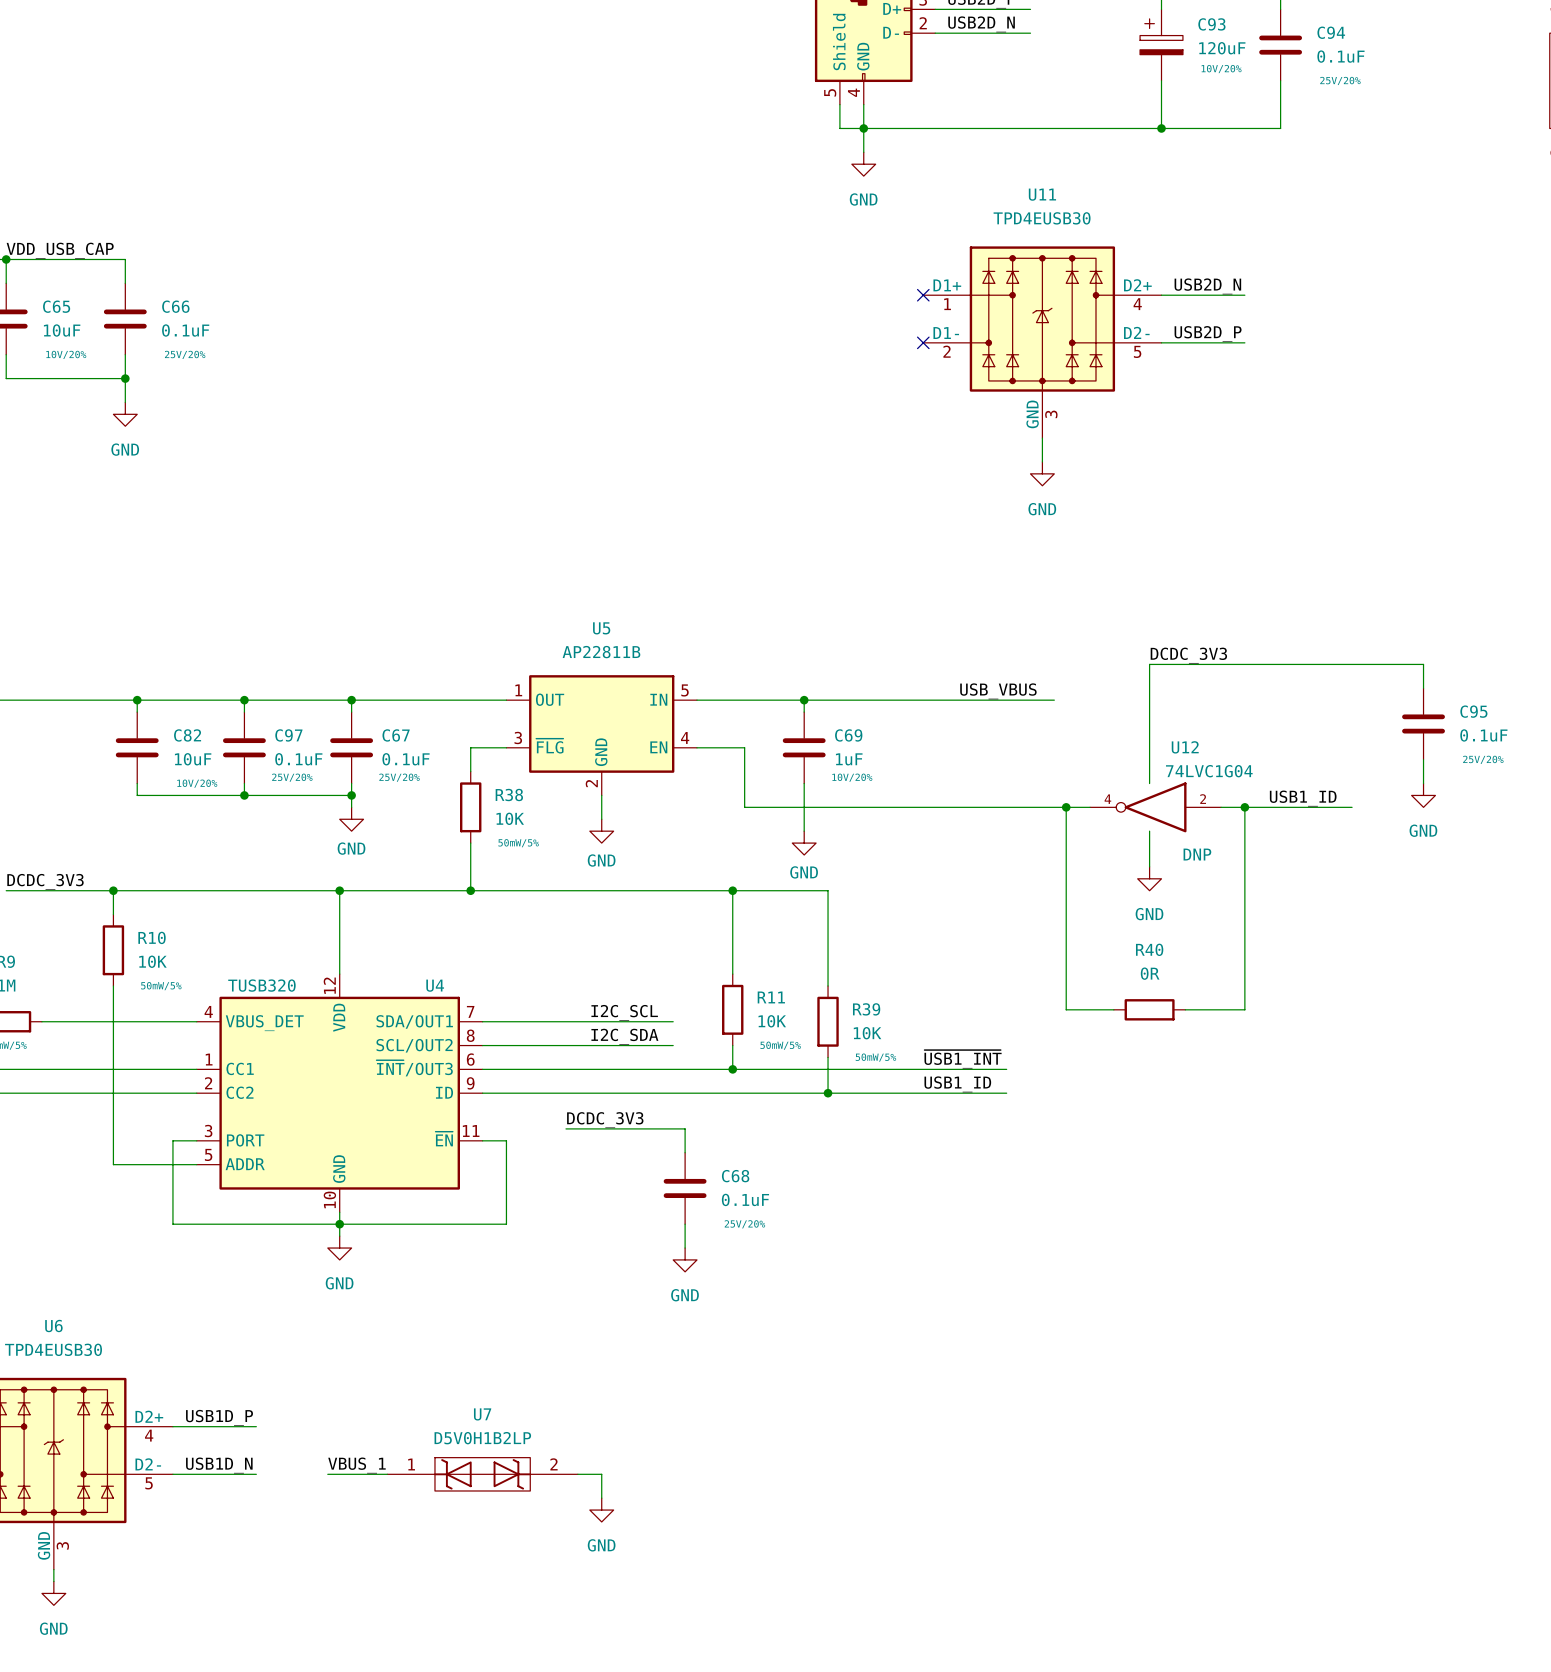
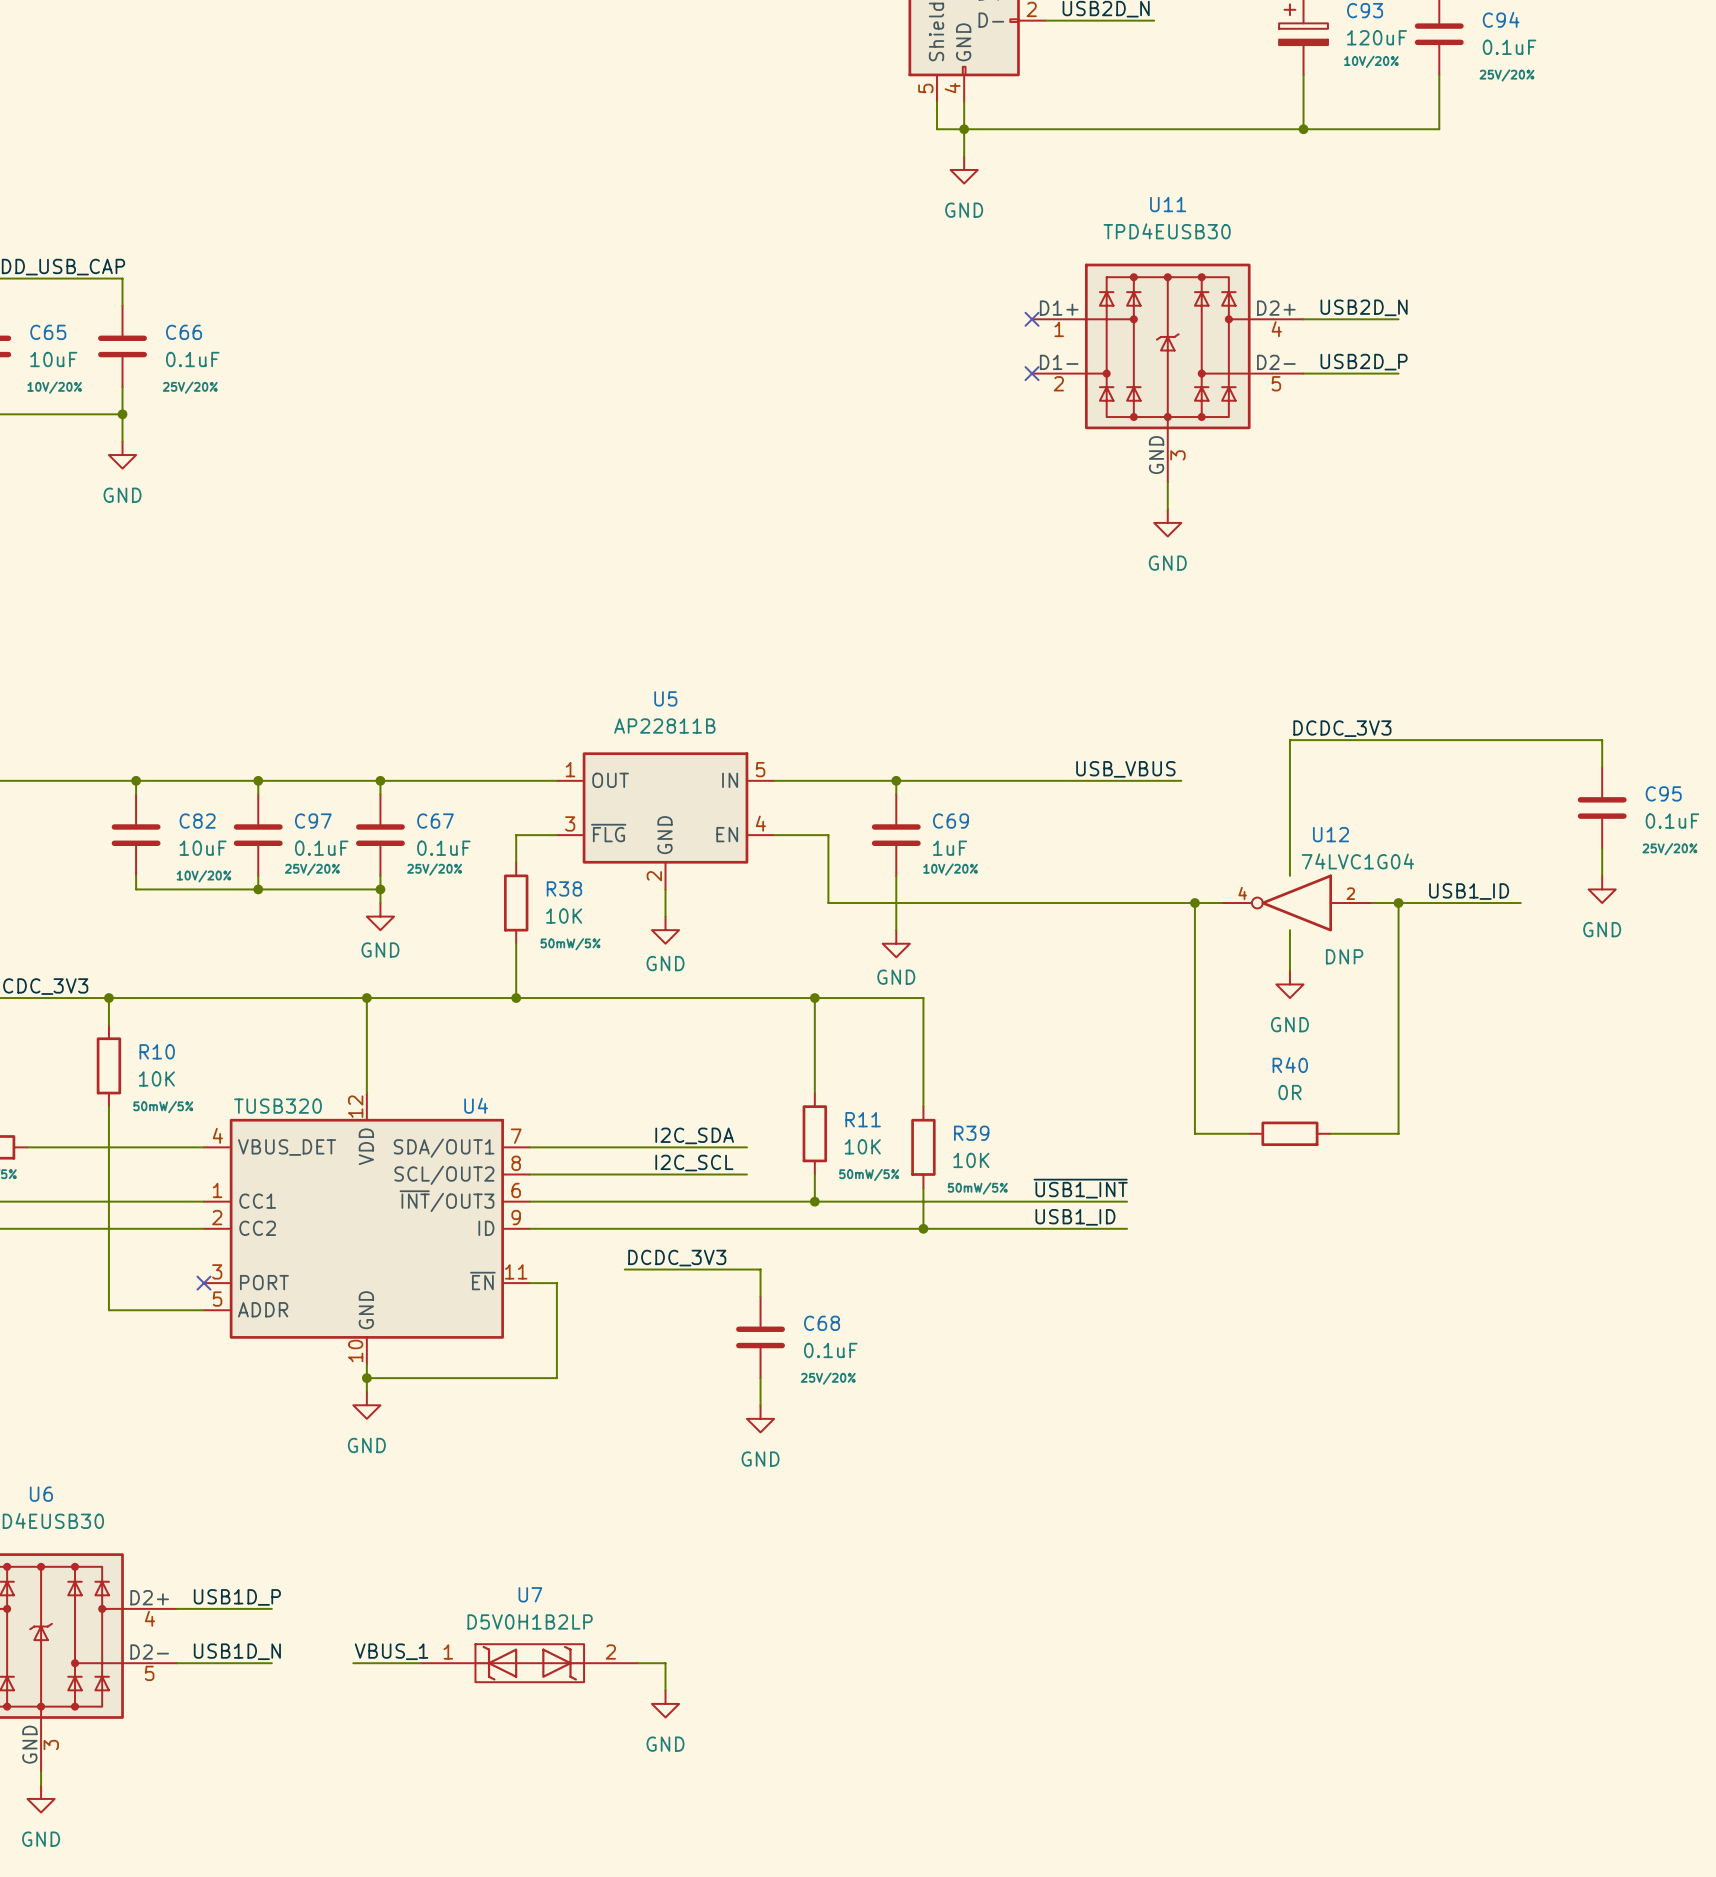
label: I2C_SCL (624, 1012) -> I2C_SDA (694, 1135)
label: I2C_SDA (624, 1036) -> I2C_SCL (694, 1163)
wire: (196, 1140) (172, 1140) (172, 1224) (339, 1224) -> none
no-connect mark: none -> (203, 1283)

